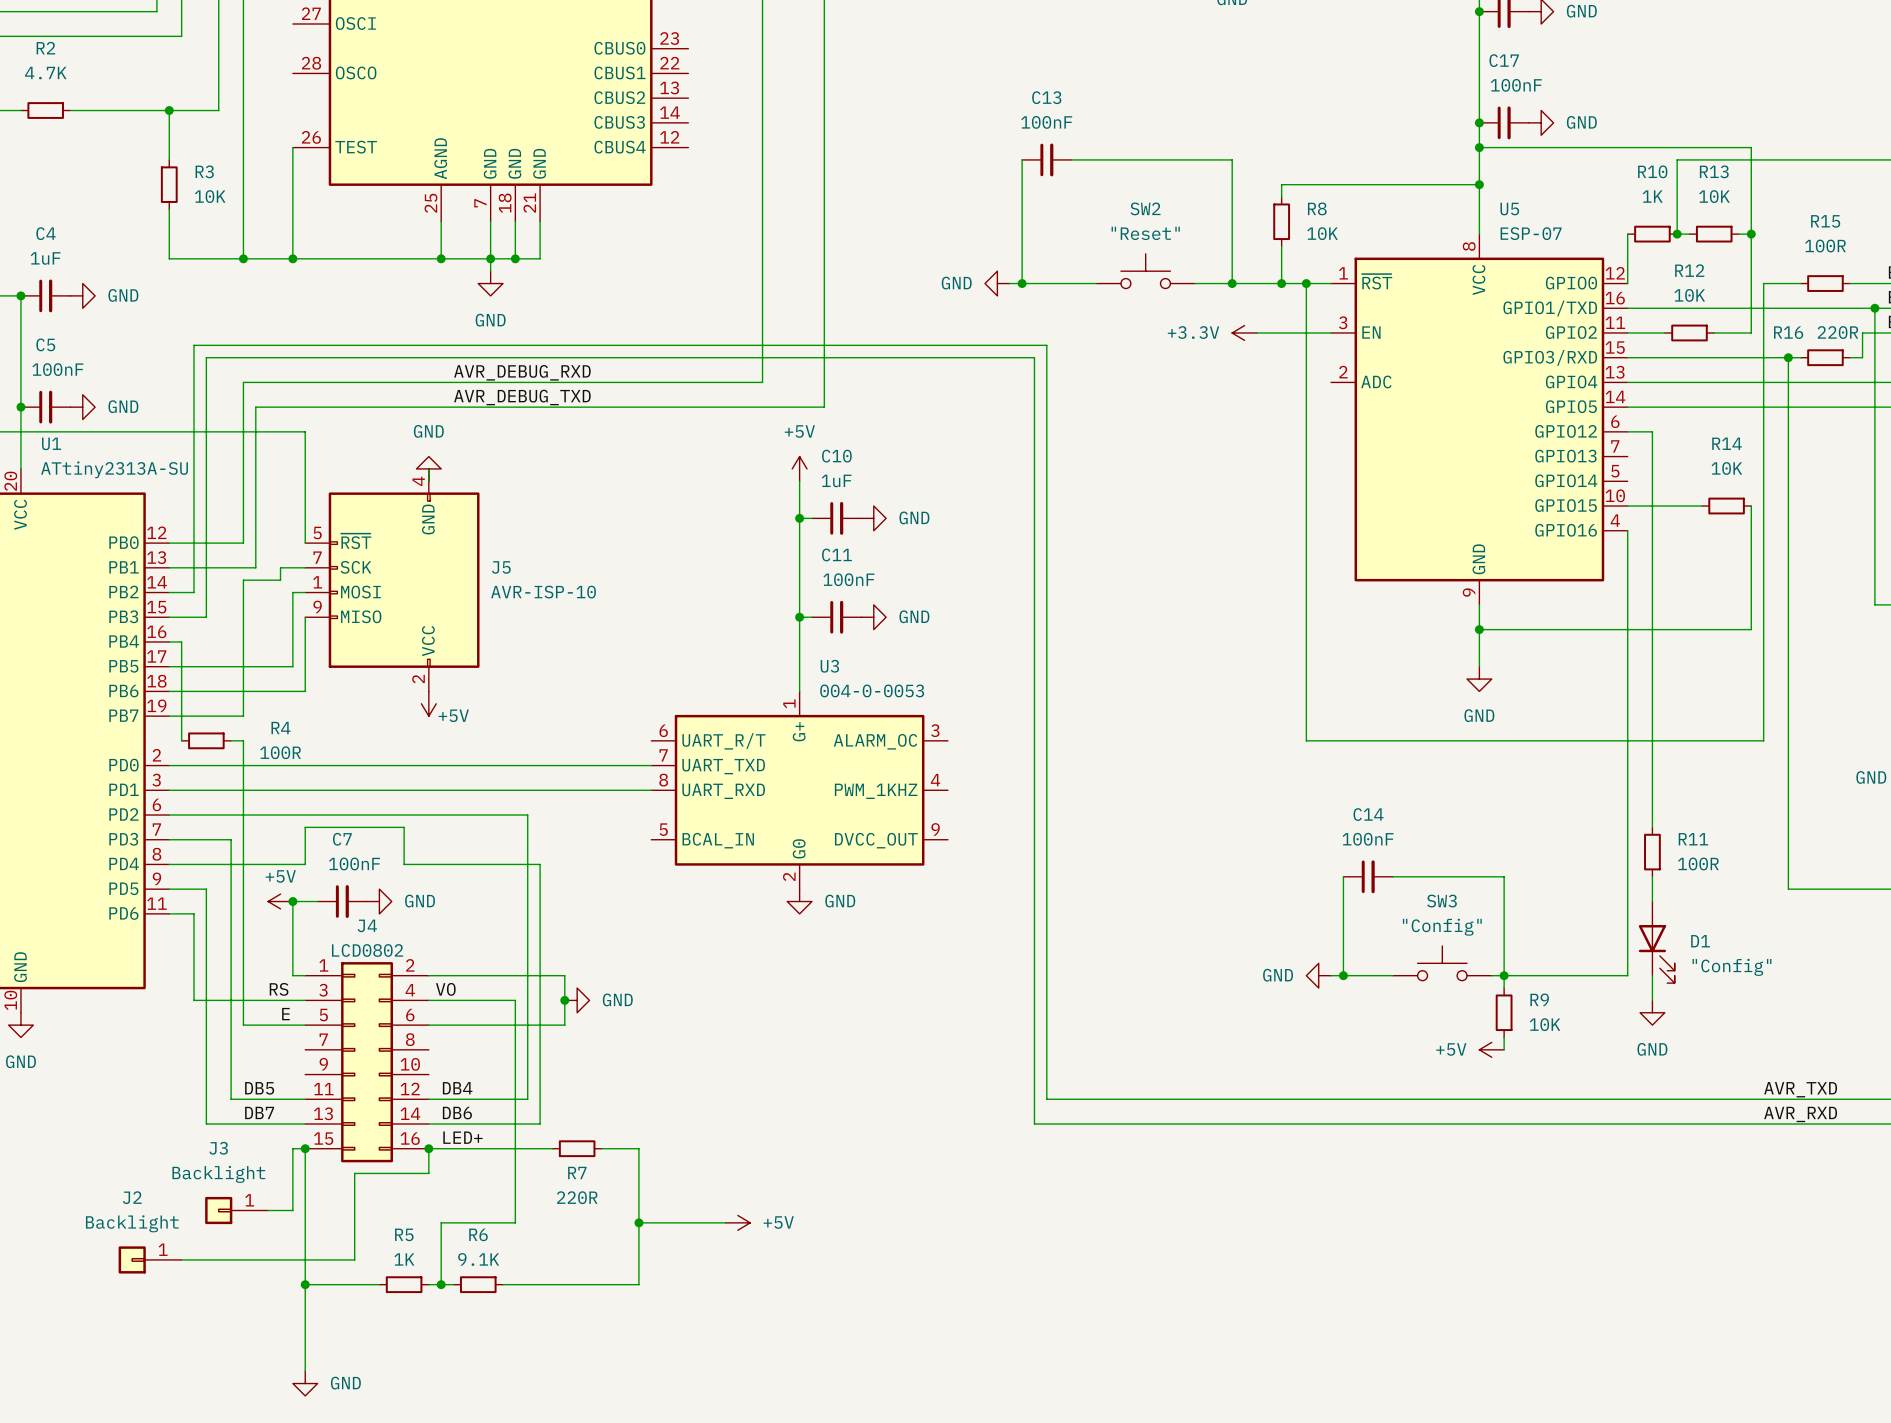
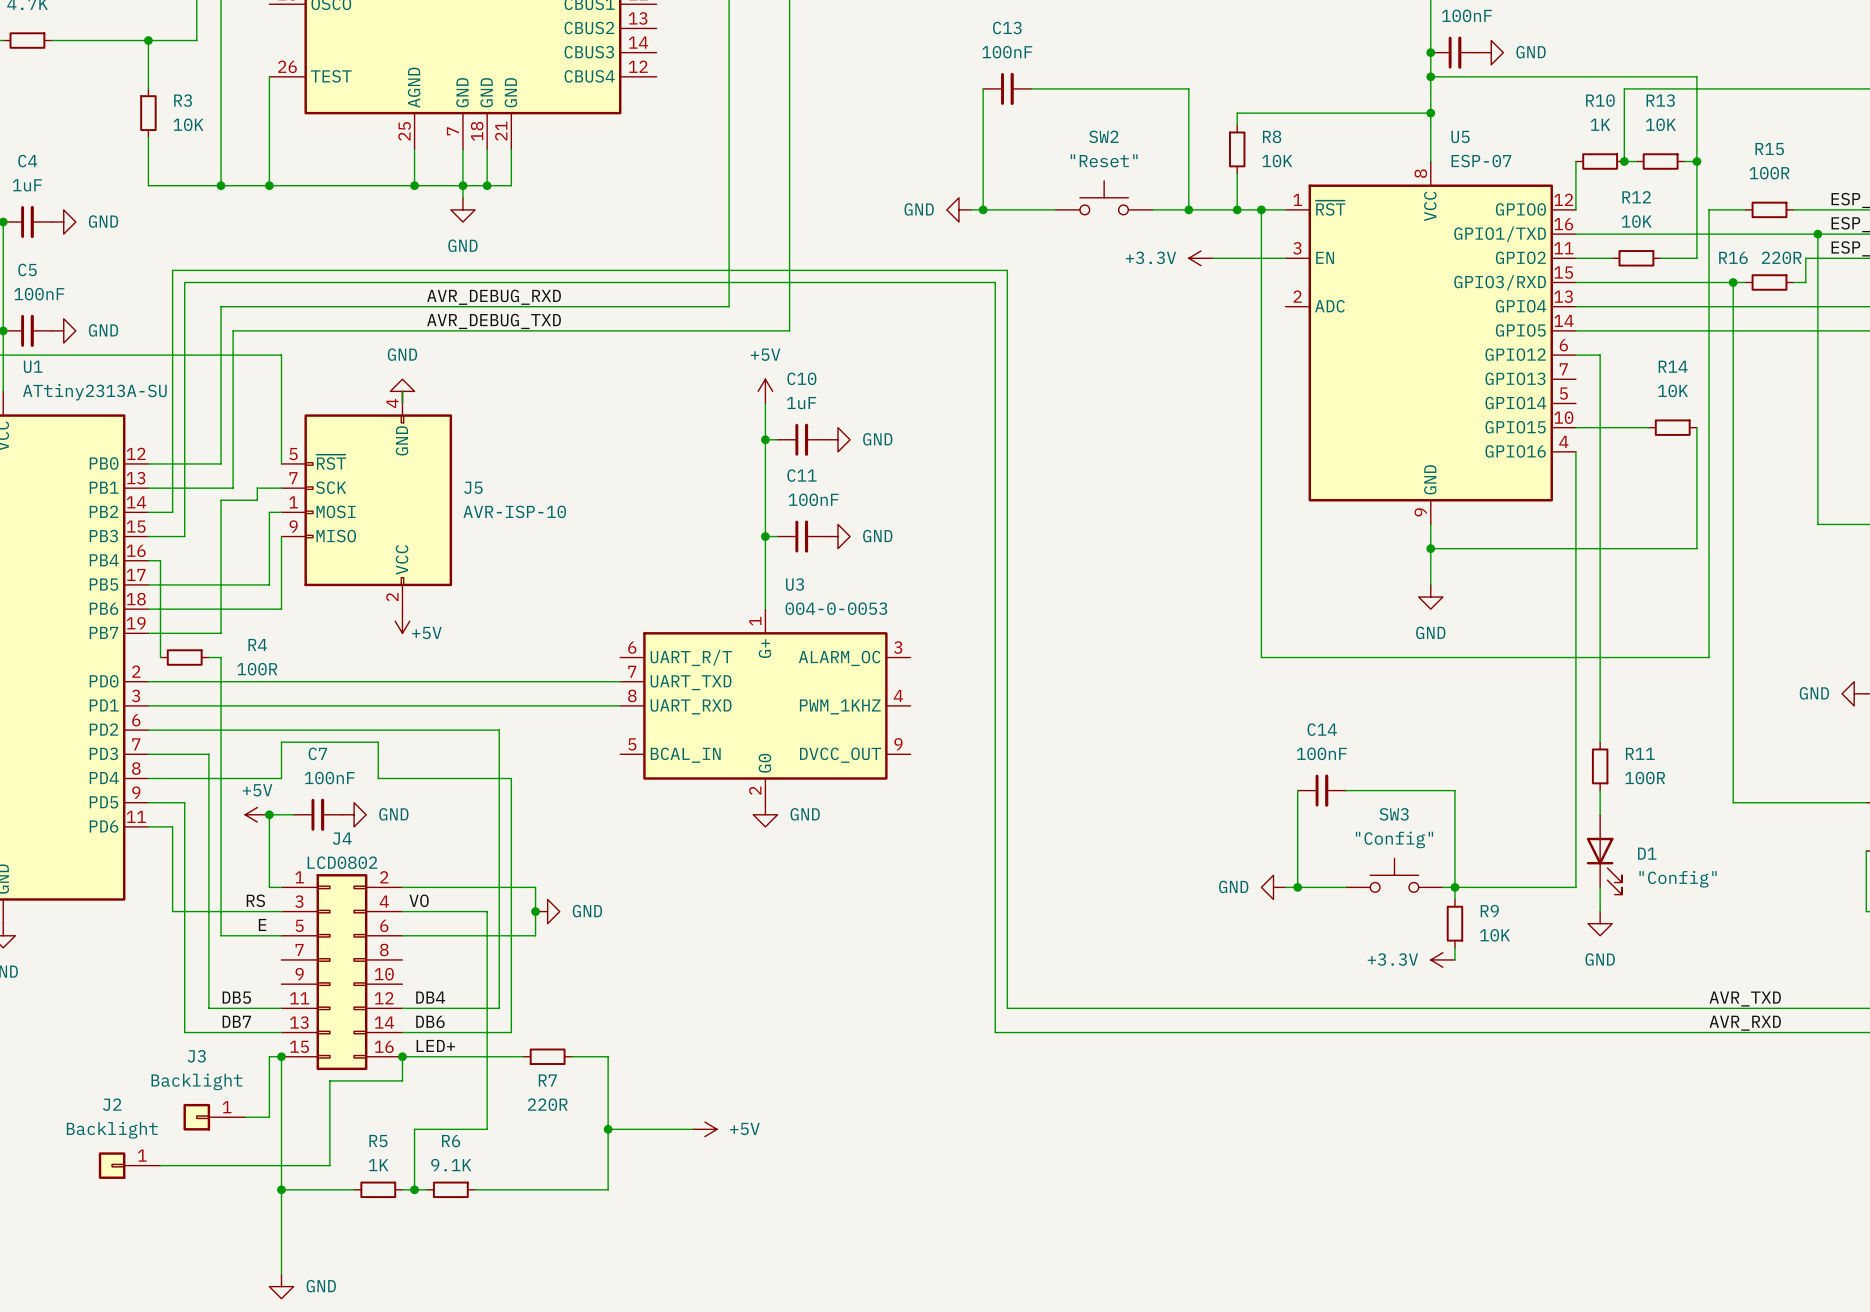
power symbol: +5V (1491, 1049) -> +3.3V (1442, 959)

